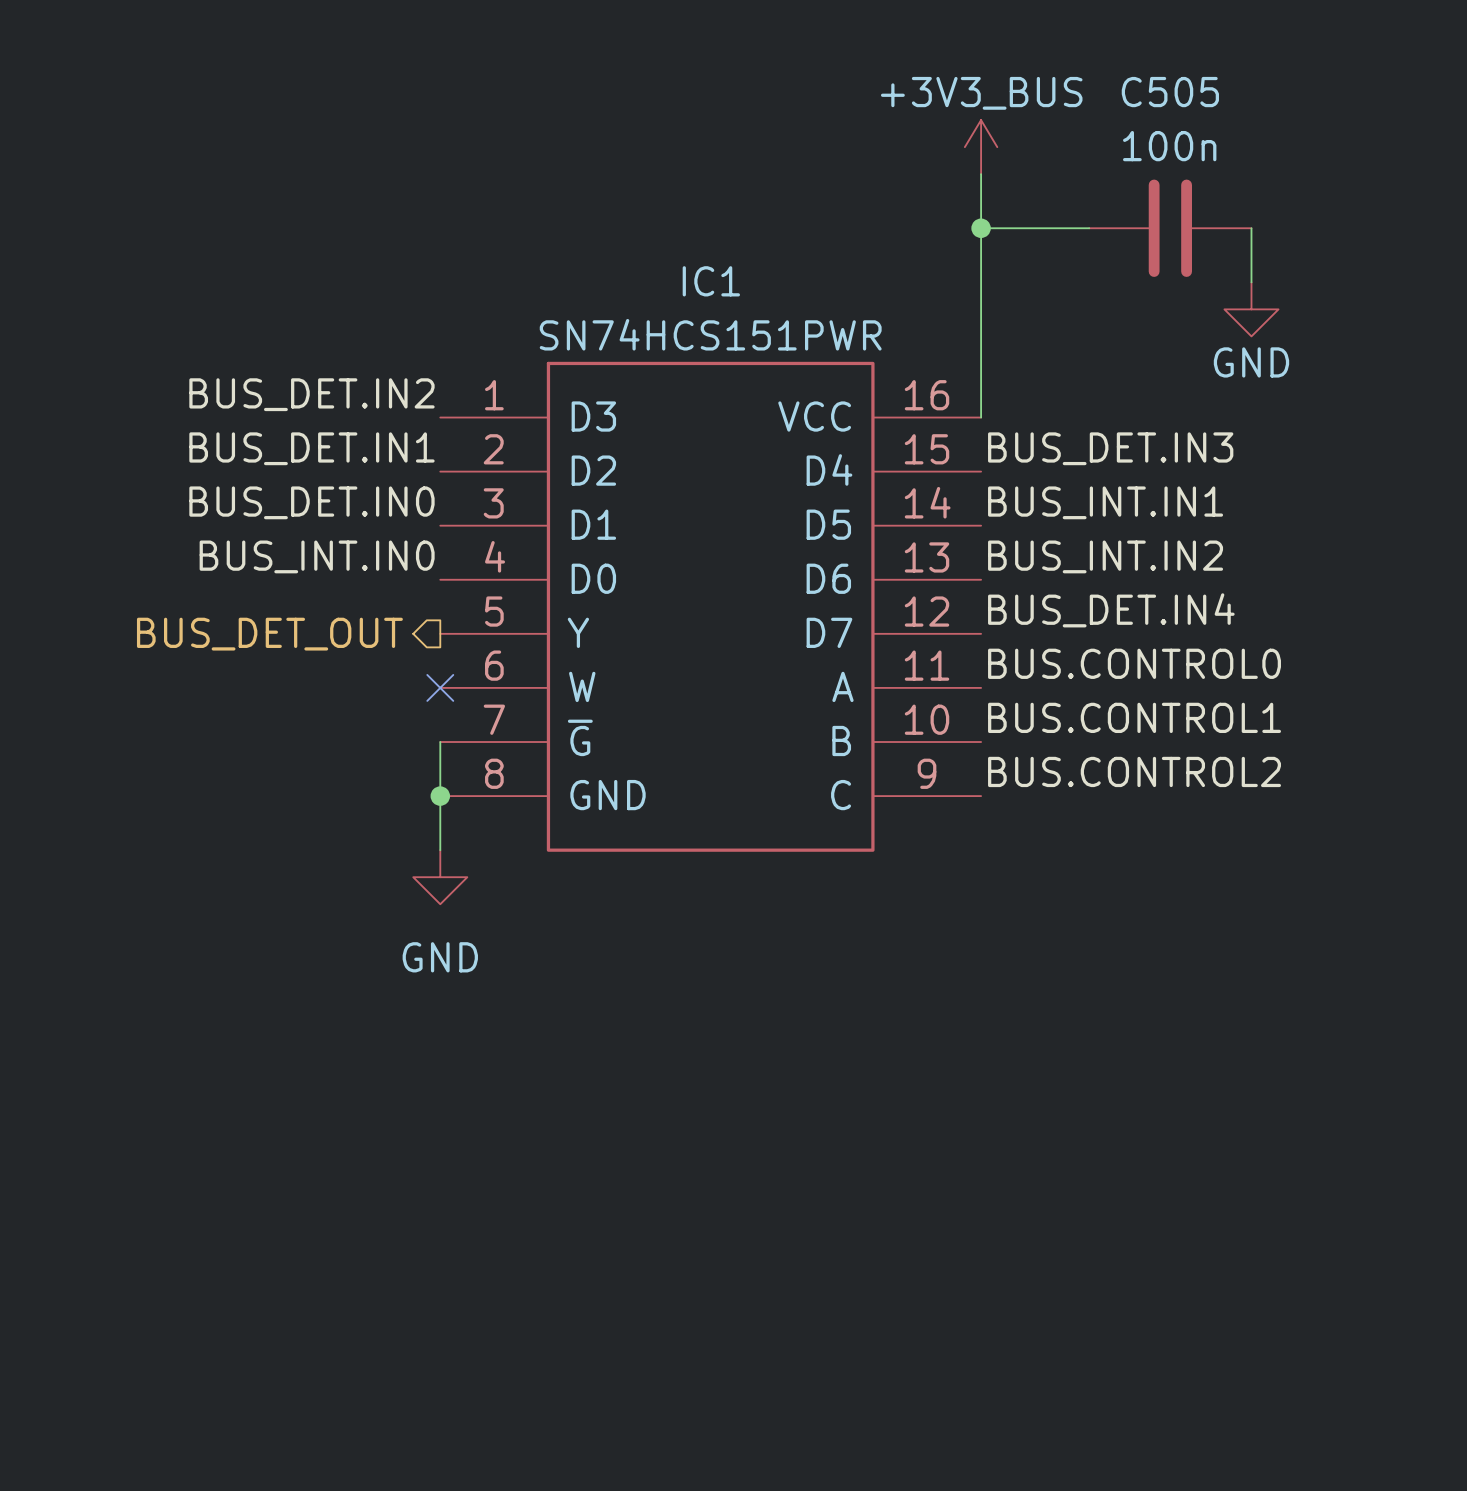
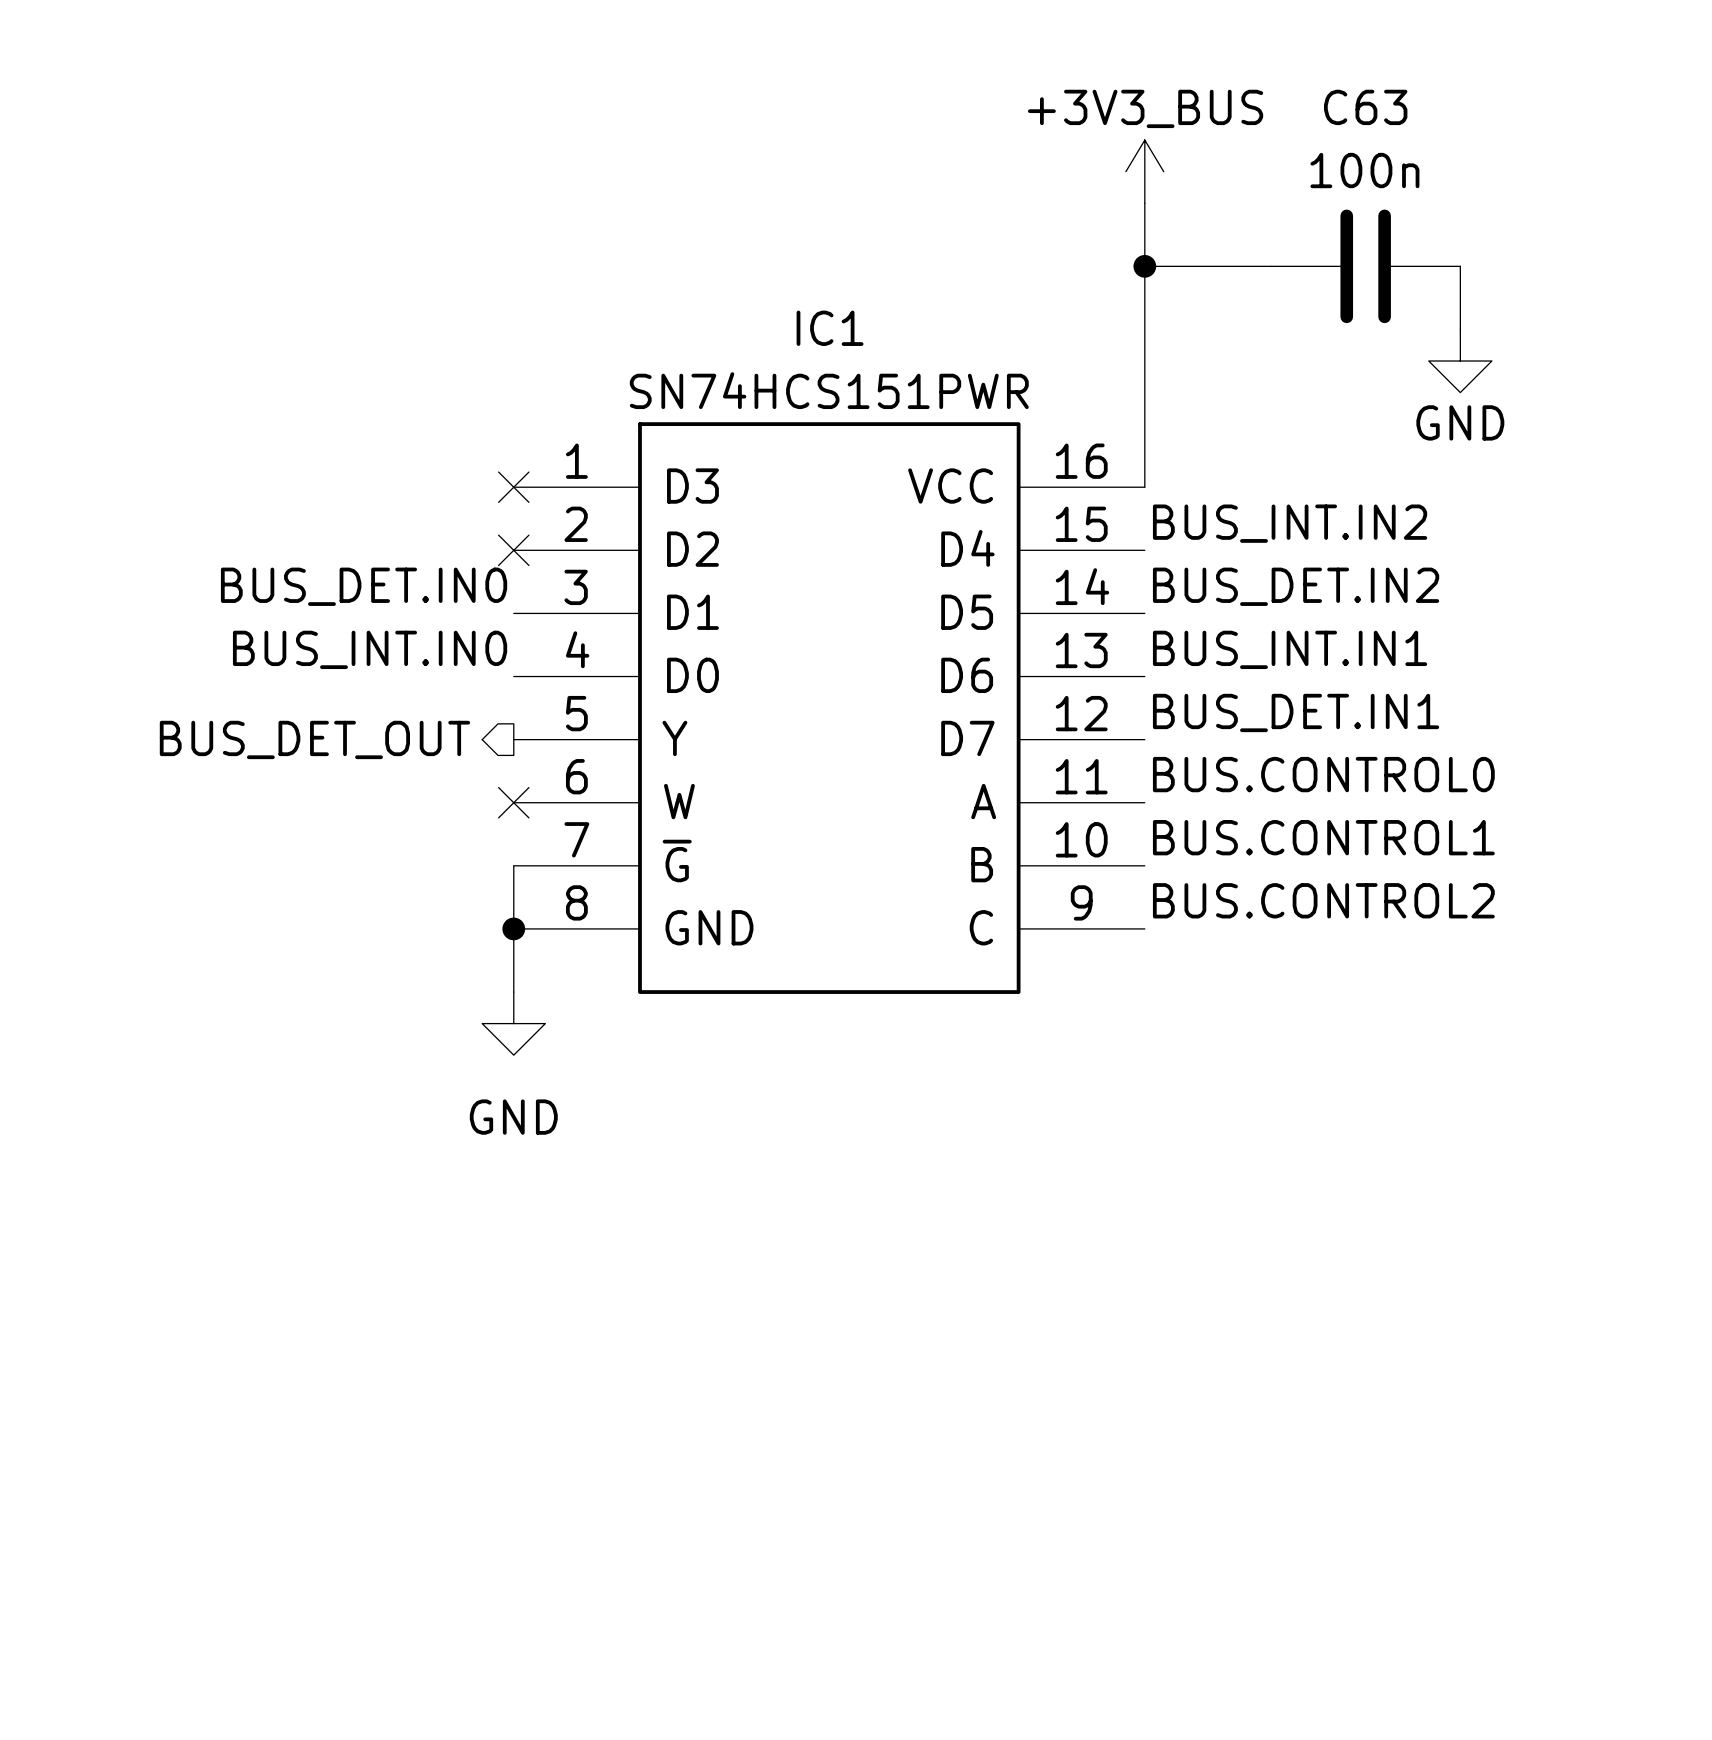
C505 name: C505 (1170, 92) -> C63 (1365, 107)
label: BUS_DET.IN2 (311, 394) -> none
no-connect mark: none -> (513, 487)
label: BUS_DET.IN1 (311, 448) -> none
label: BUS_DET.IN3 (1110, 448) -> BUS_INT.IN2 (1290, 523)
no-connect mark: none -> (513, 550)
label: BUS_INT.IN1 (1105, 502) -> BUS_DET.IN2 (1296, 586)
label: BUS_INT.IN2 (1105, 556) -> BUS_INT.IN1 (1290, 649)
label: BUS_DET.IN4 (1111, 610) -> BUS_DET.IN1 (1296, 712)

